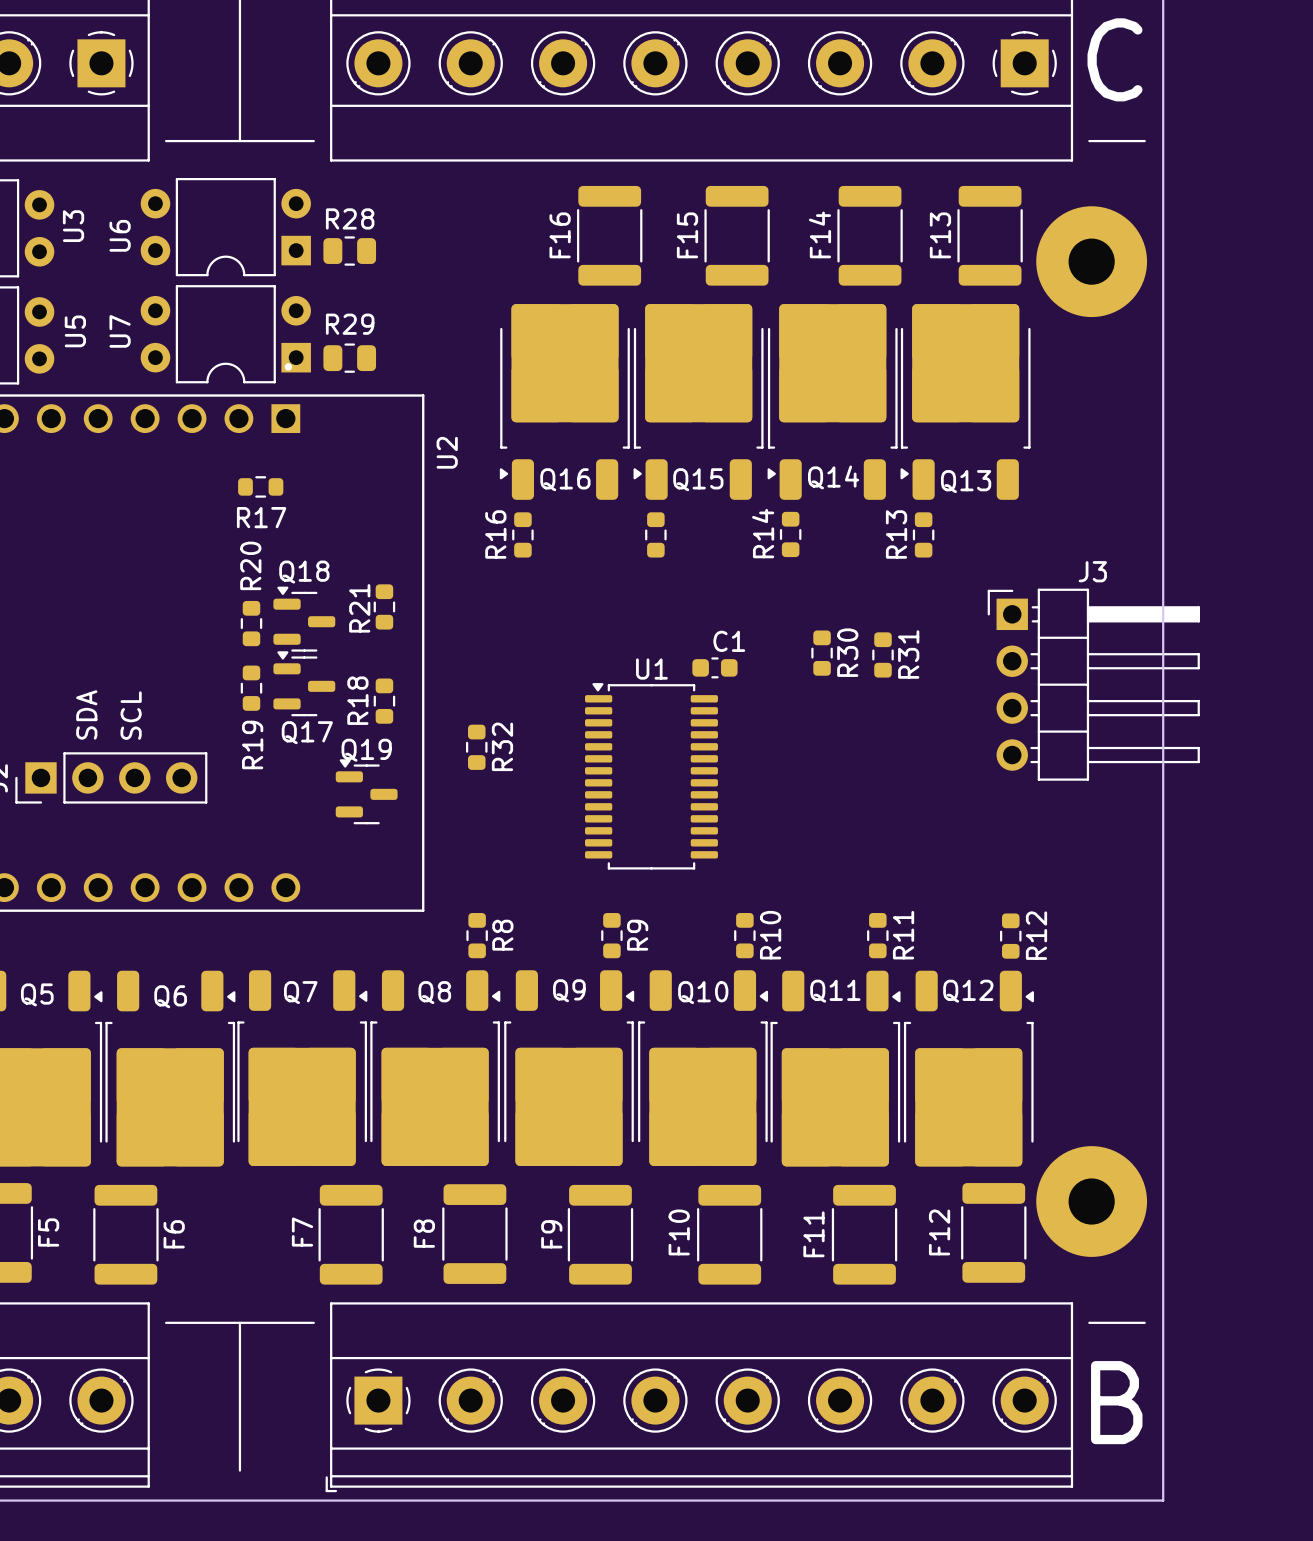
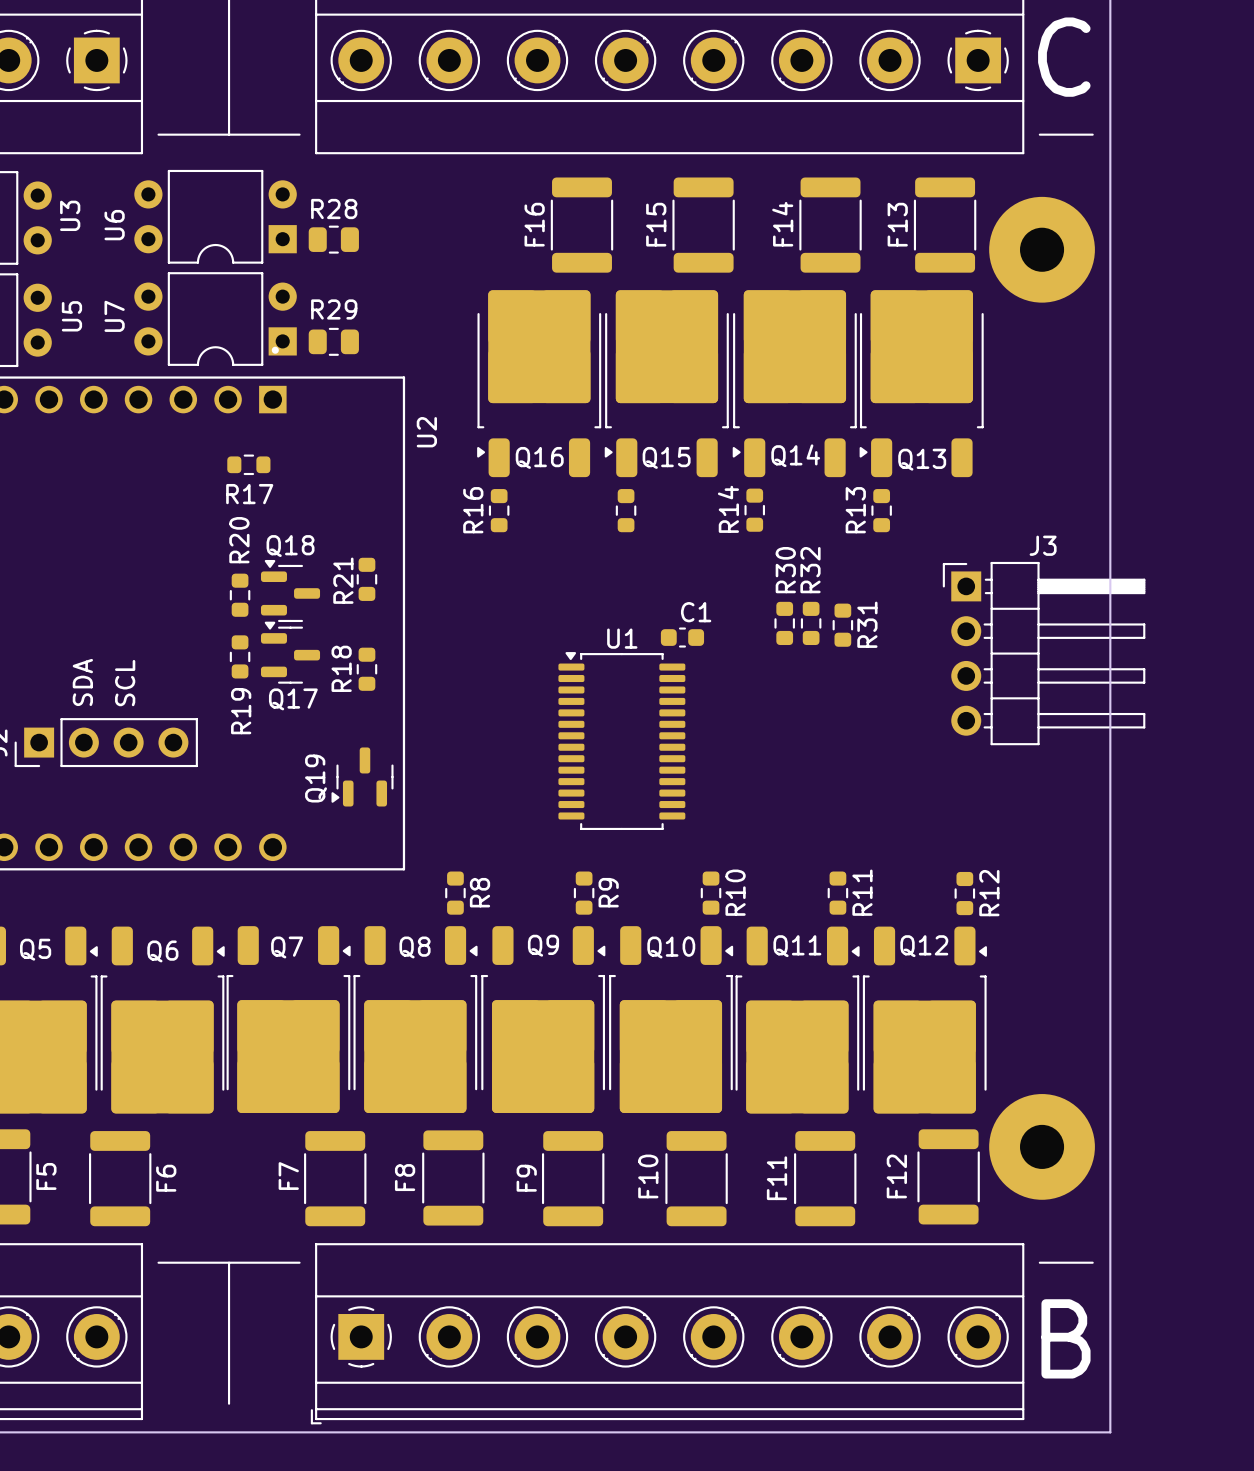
R30 name position: R30 (847, 652) -> R30 (785, 570)
R32 name position: R32 (502, 746) -> R32 (810, 570)
R32 position: (476, 747) -> (811, 623)
Q19 rotation: 0° (366, 791) -> 90° counterclockwise (362, 776)

